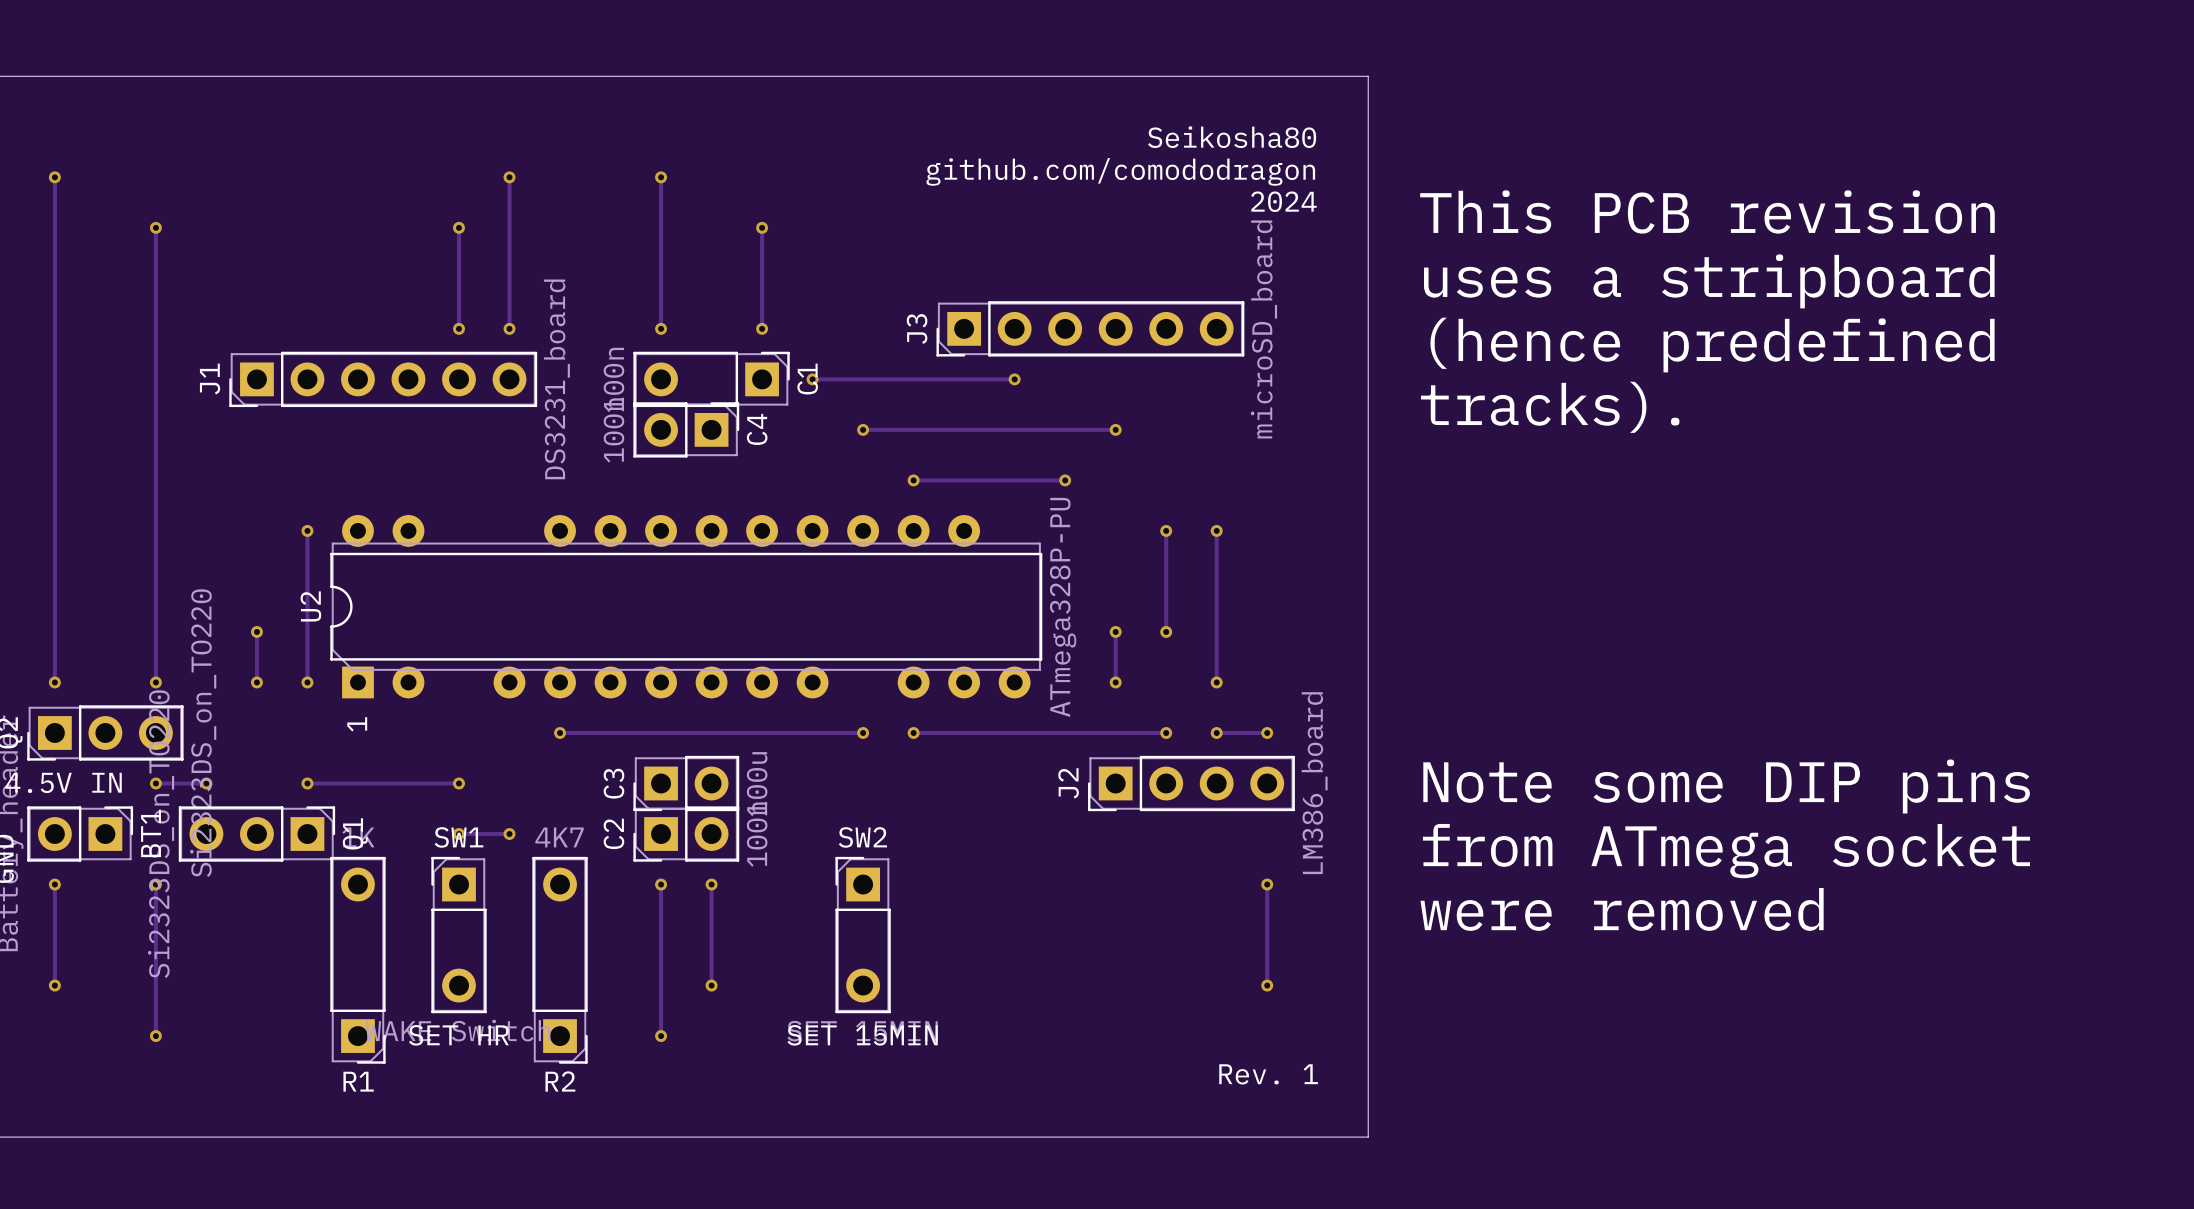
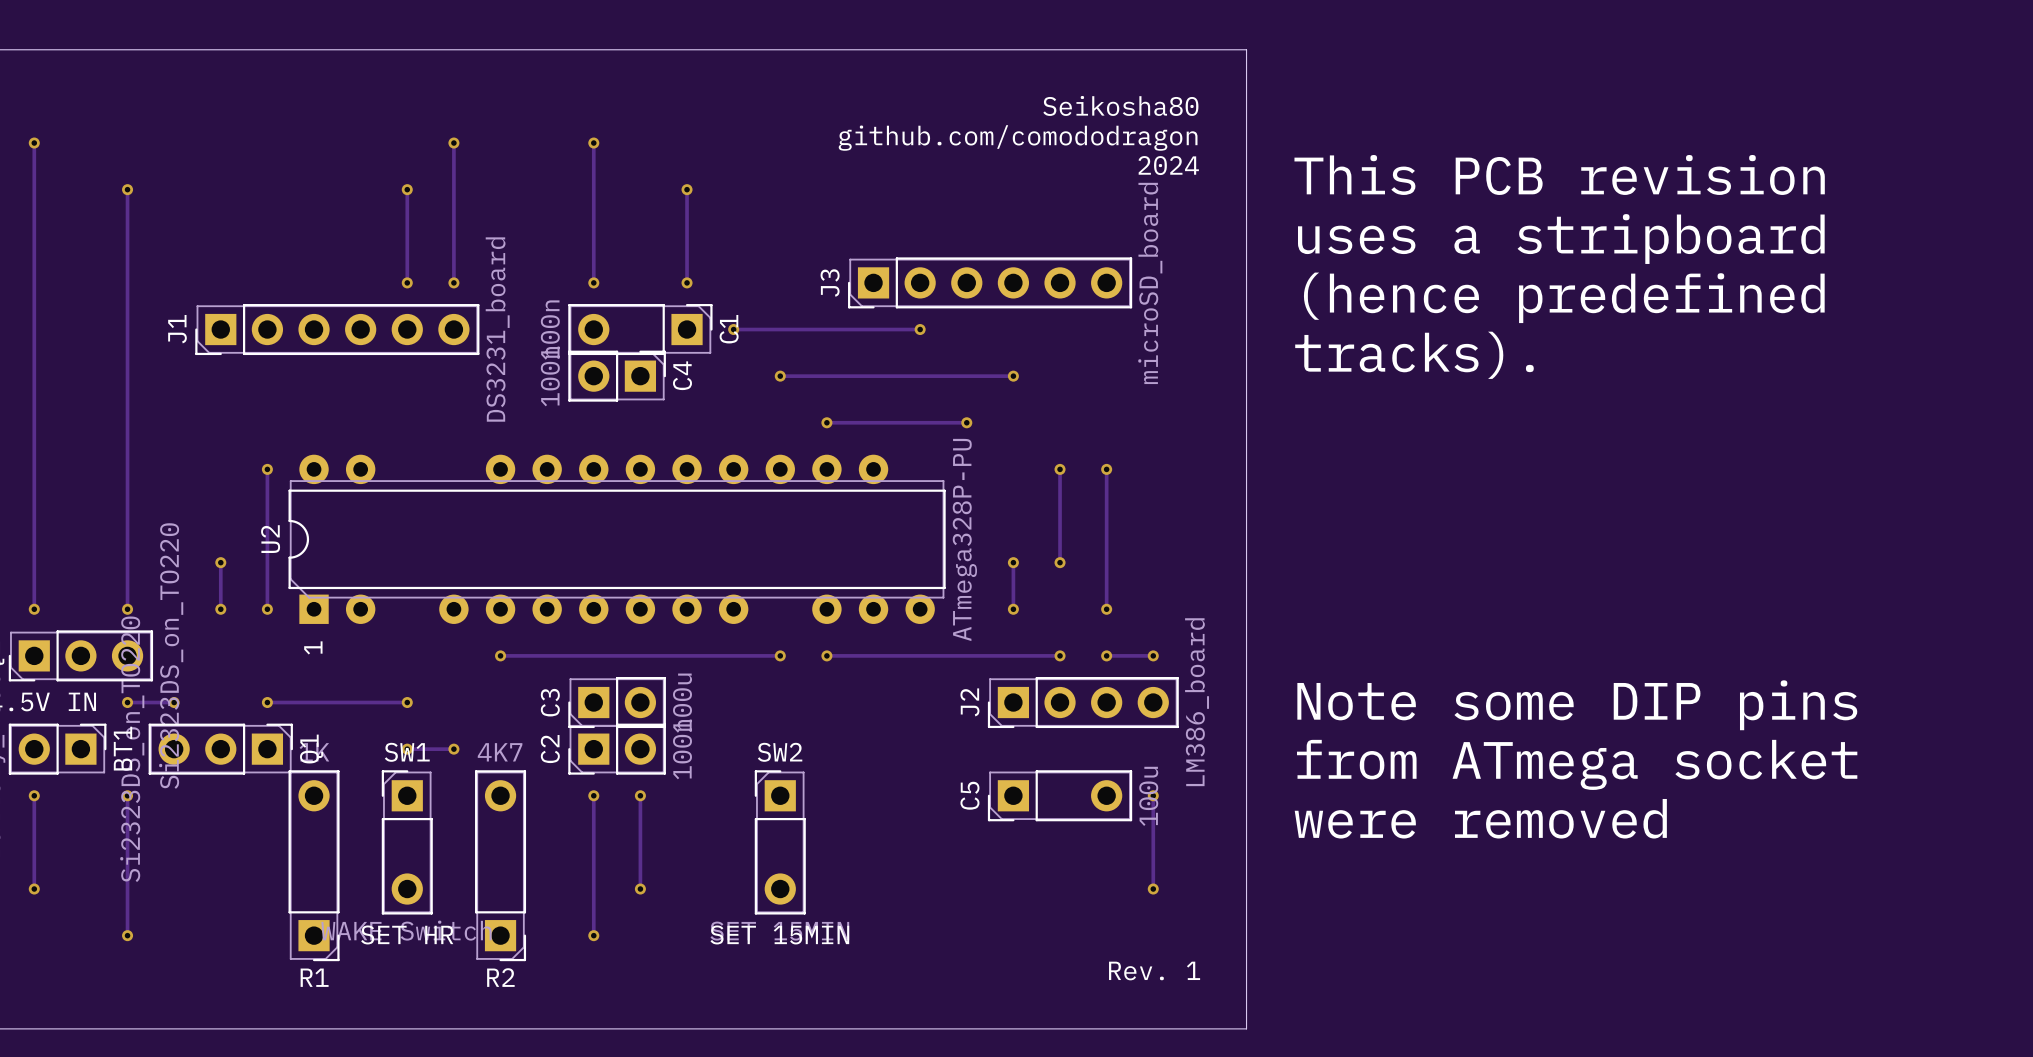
C5: none -> 100u (1060, 795)

